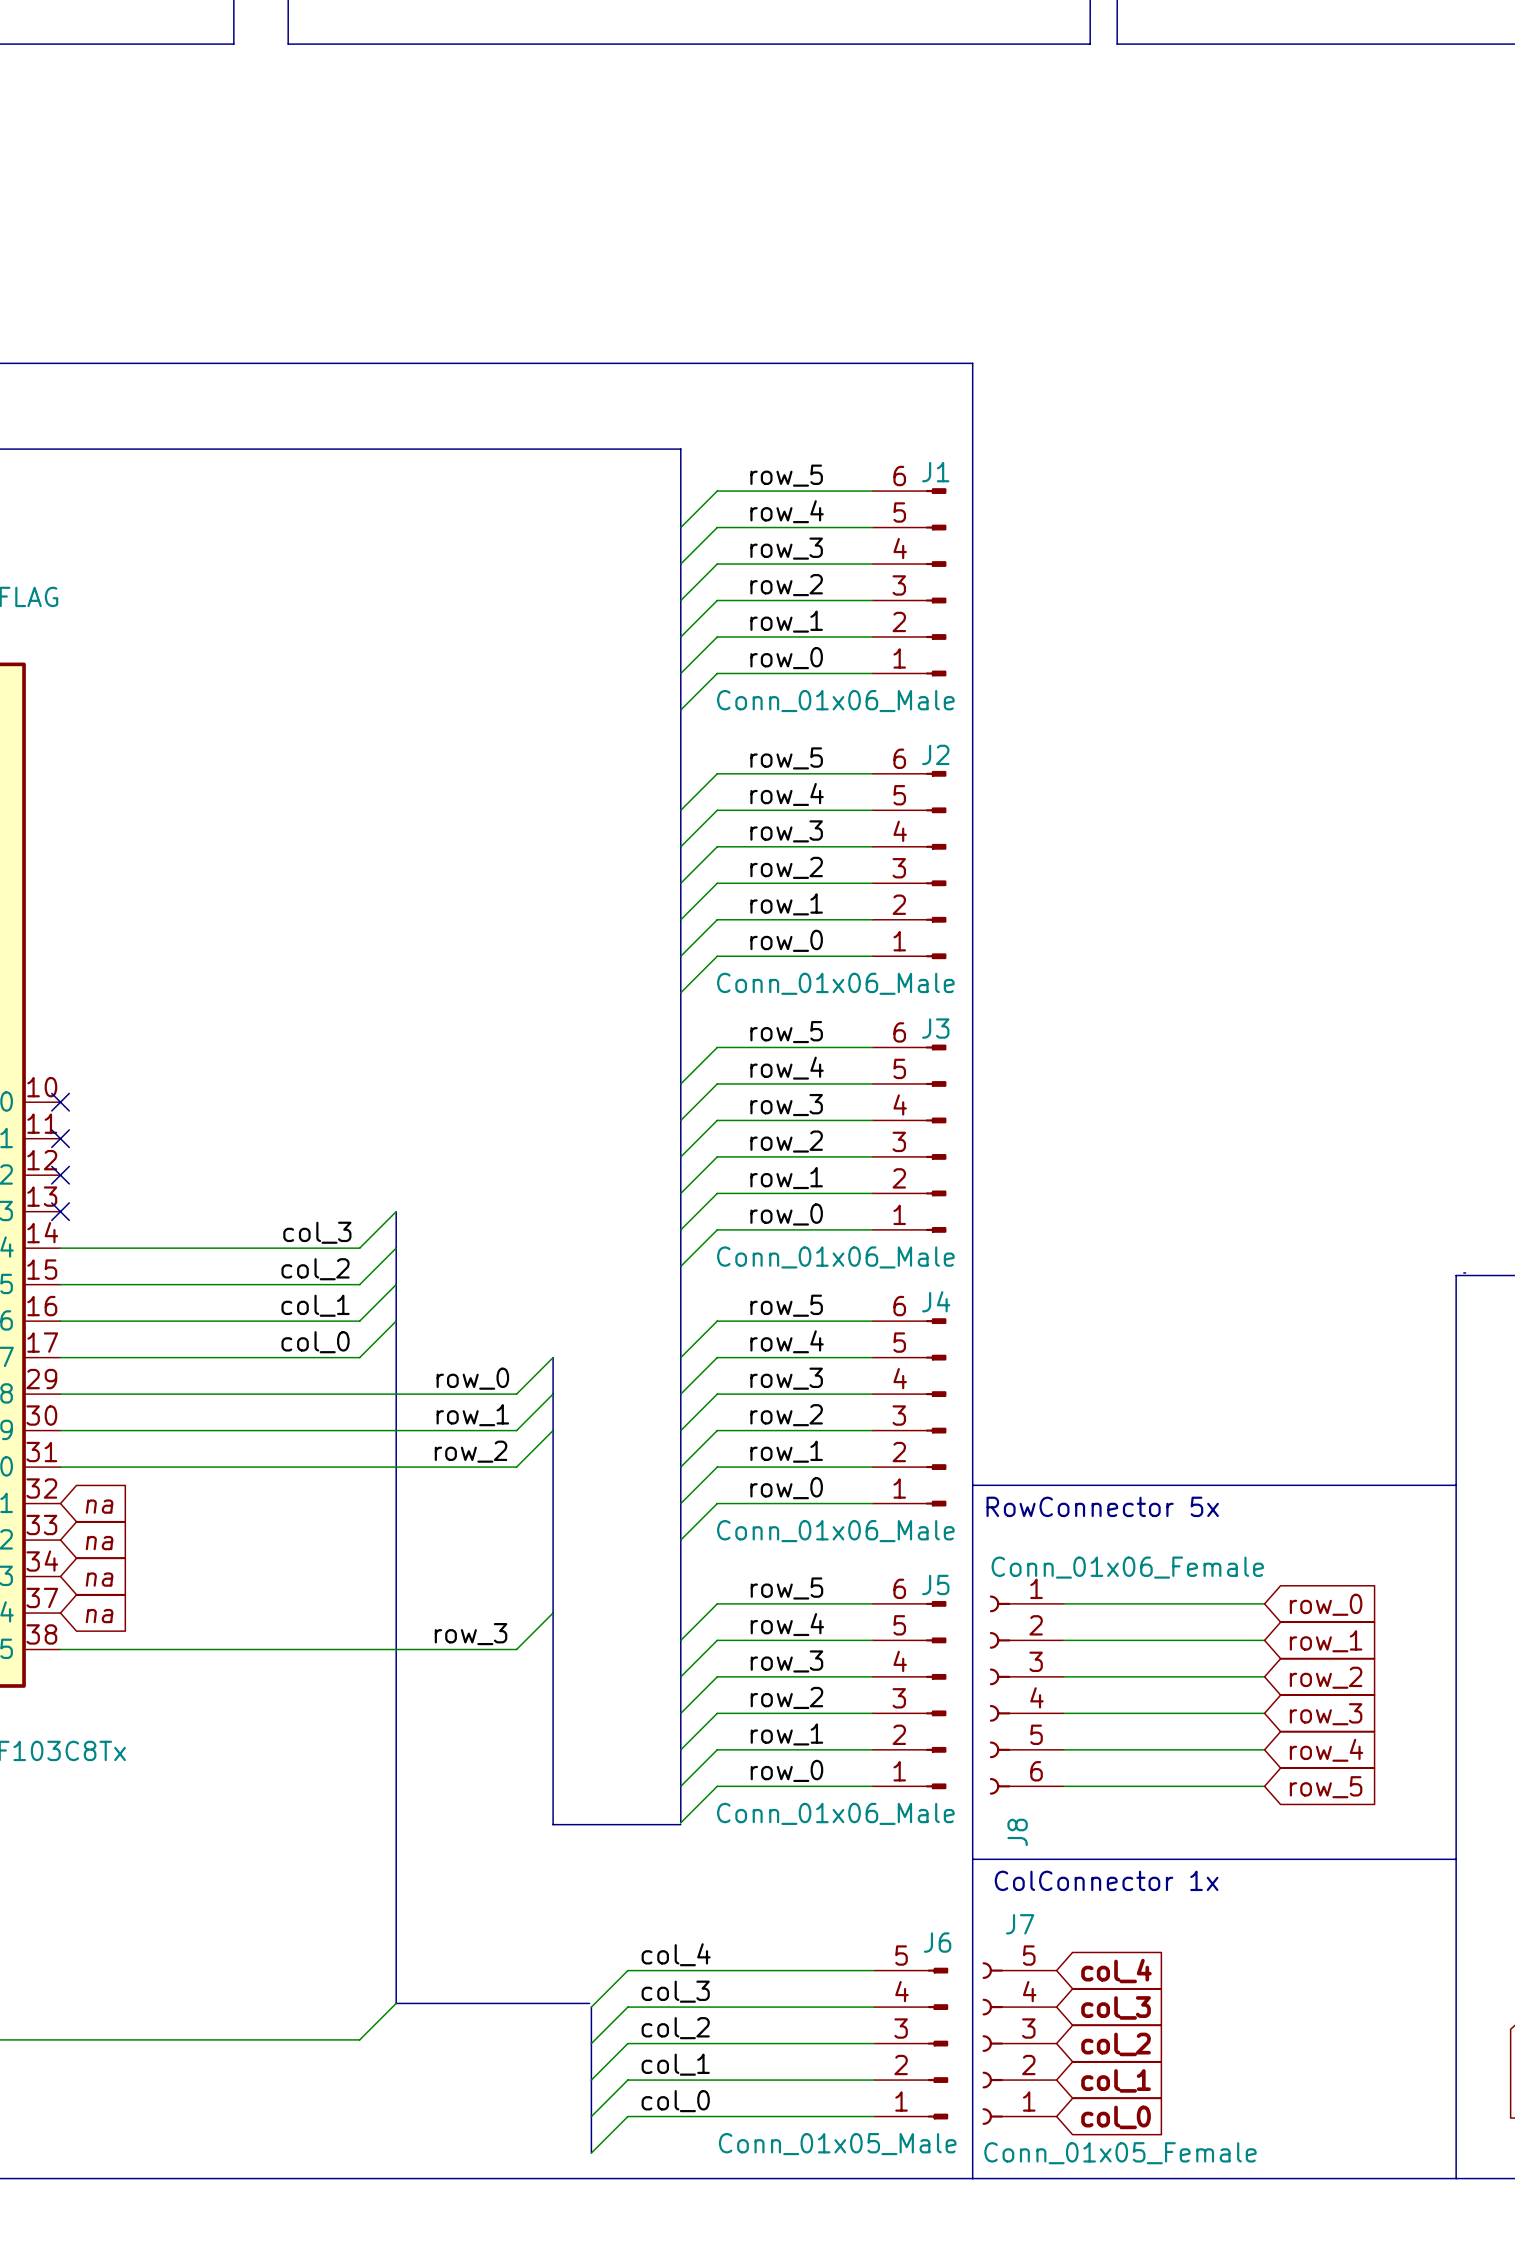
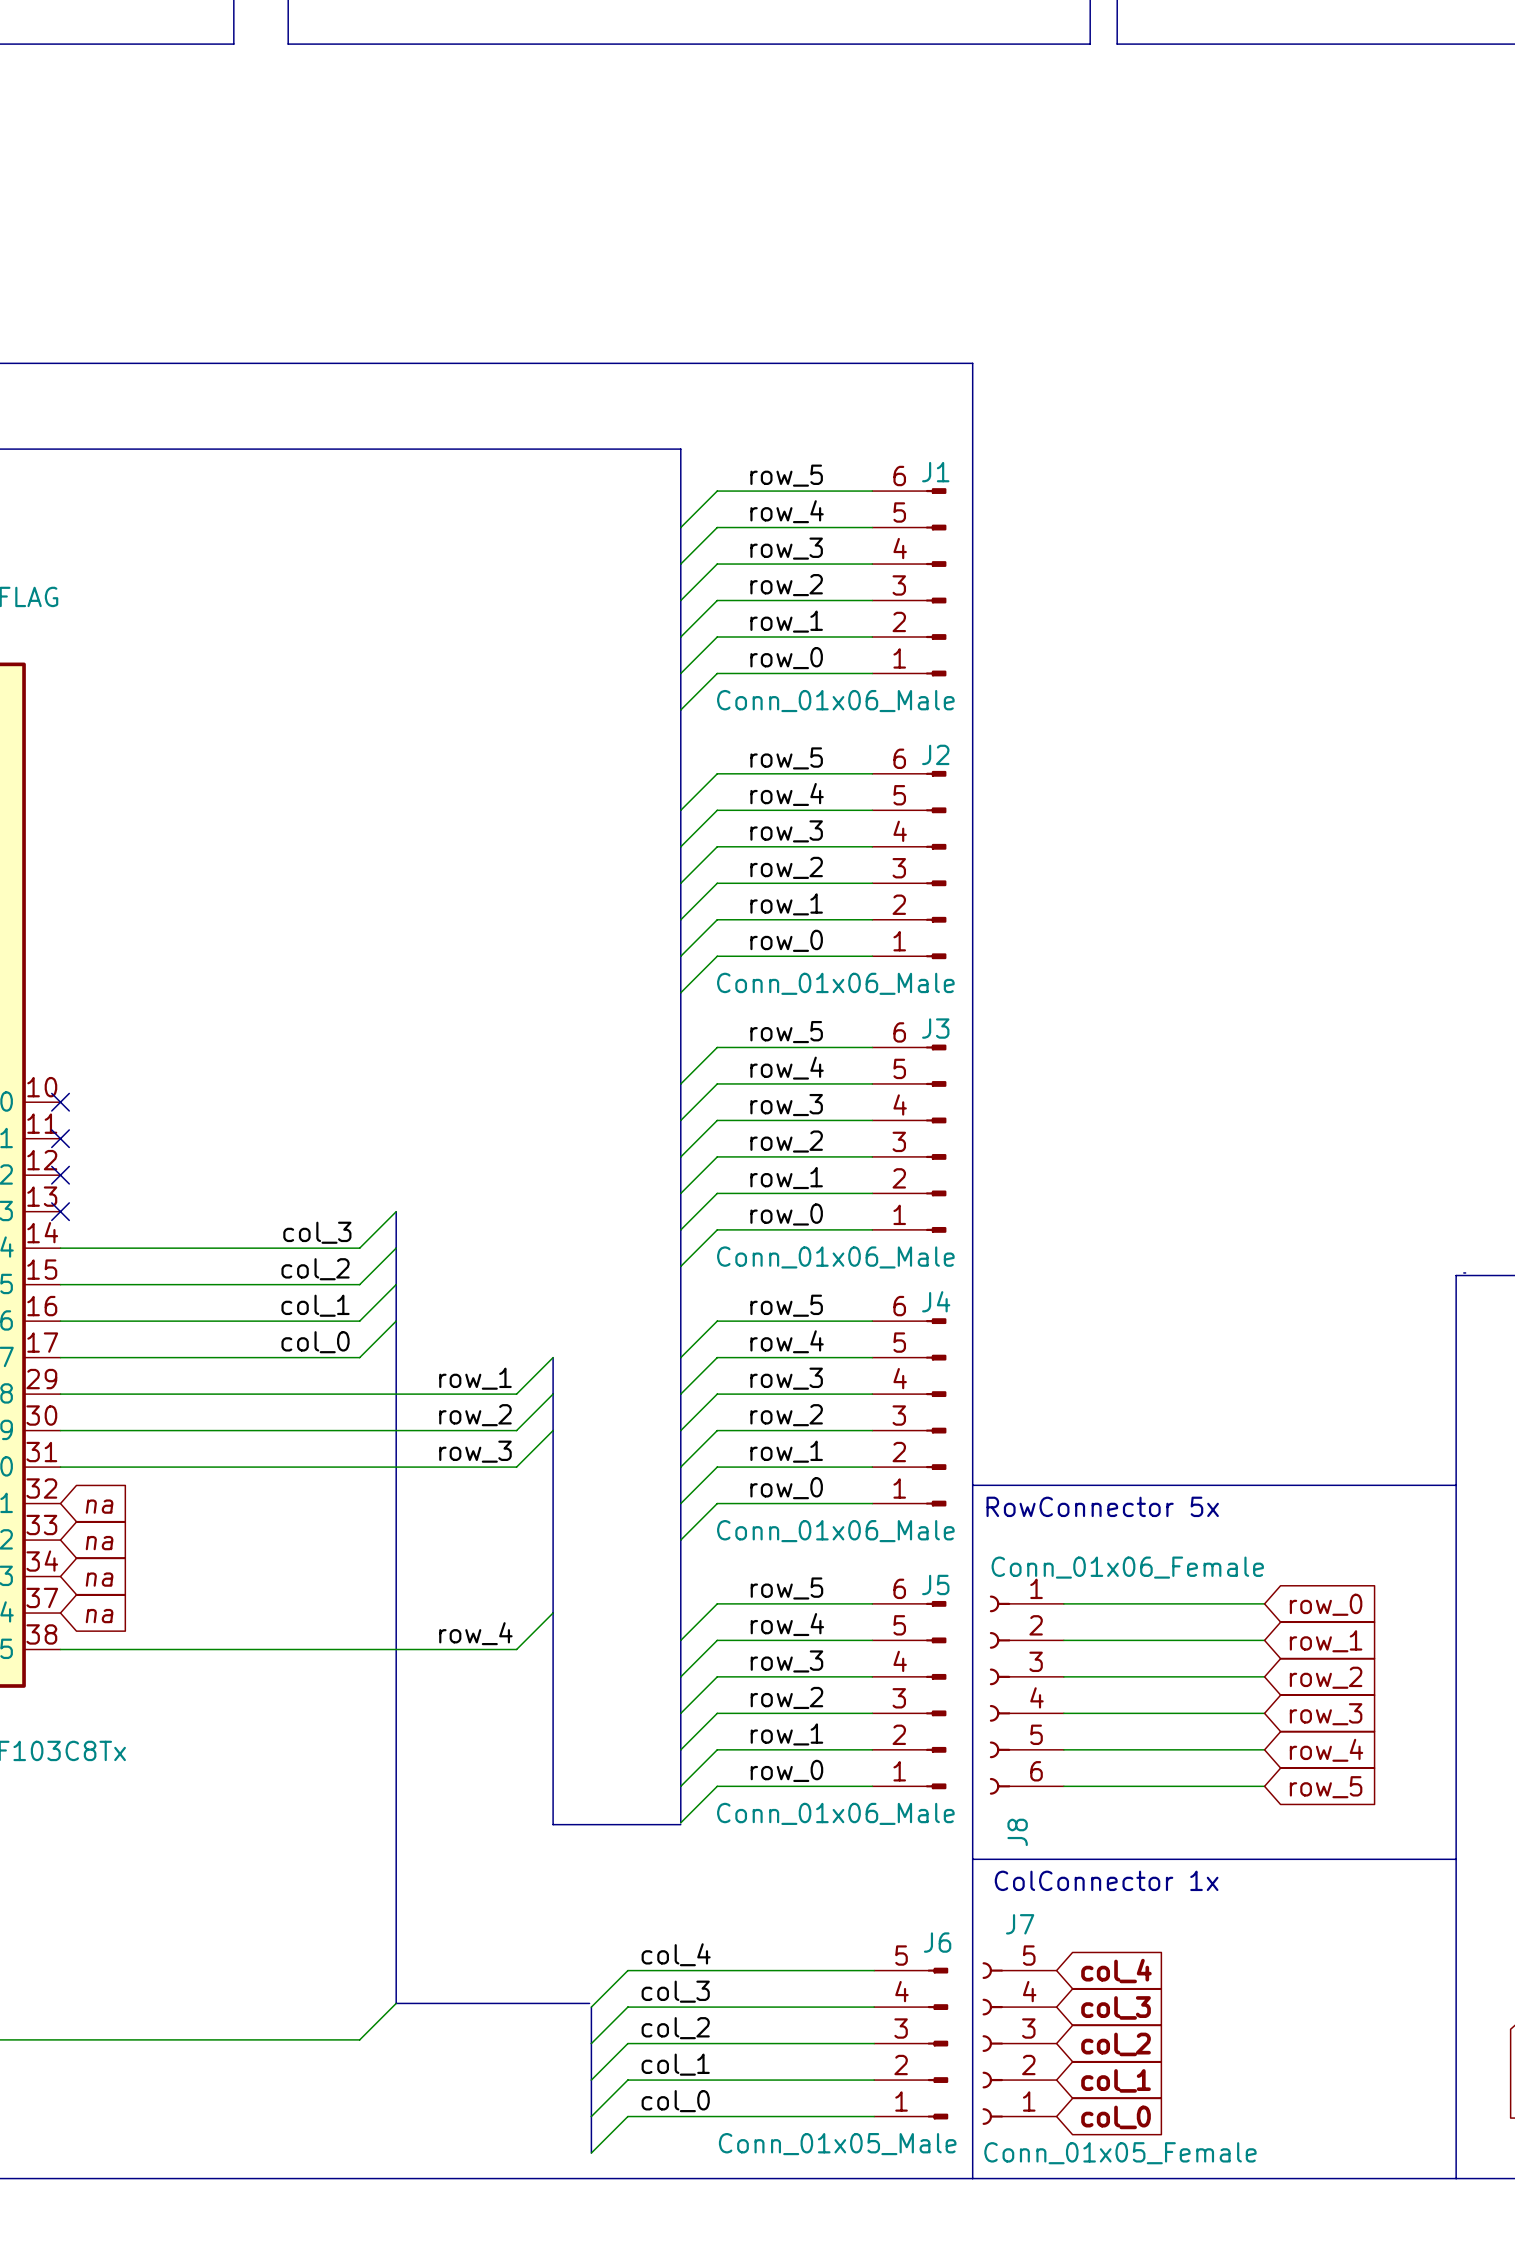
label: row_0 (472, 1378) -> none
label position: row_1 (472, 1415) -> row_1 (475, 1378)
label position: row_2 (471, 1451) -> row_2 (475, 1415)
label: none -> row_4 (475, 1633)
label position: row_3 (471, 1634) -> row_3 (475, 1451)

